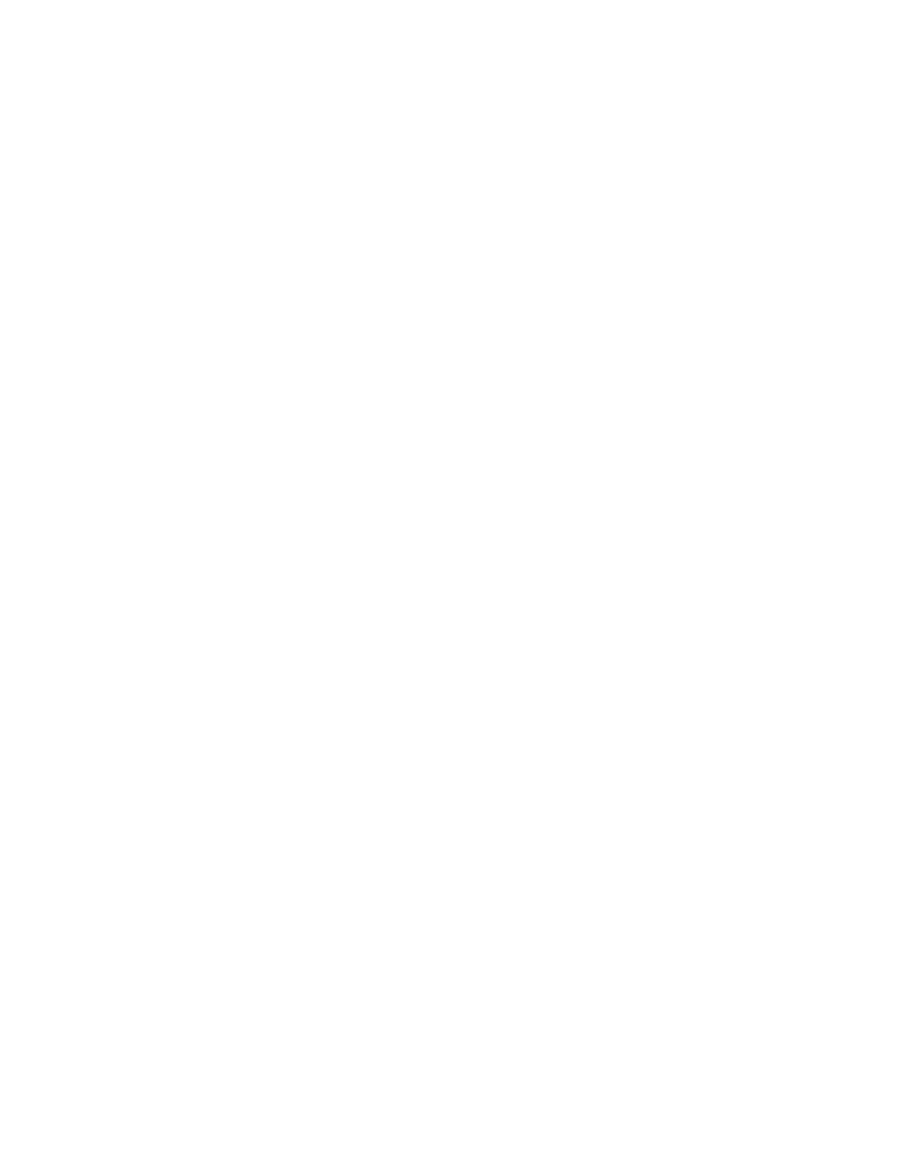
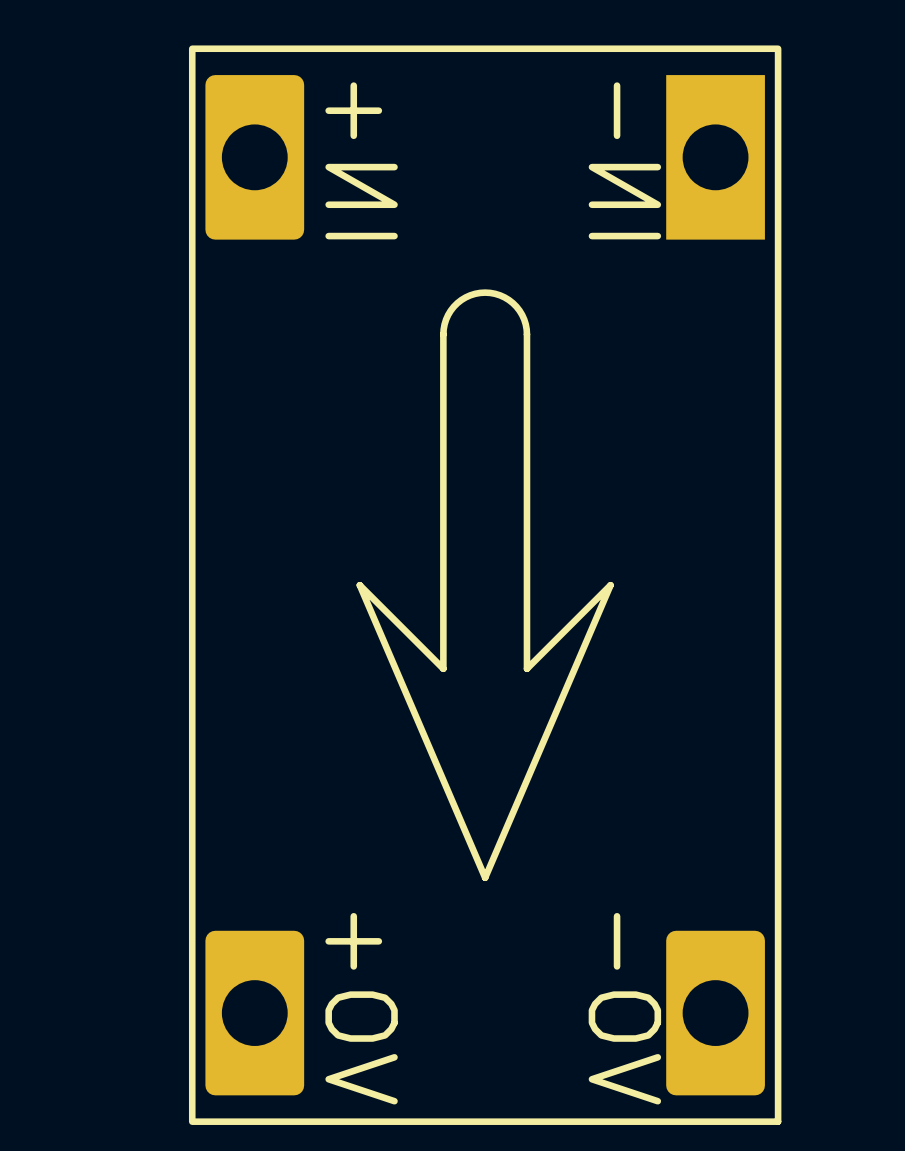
part: none -> (485, 585)

